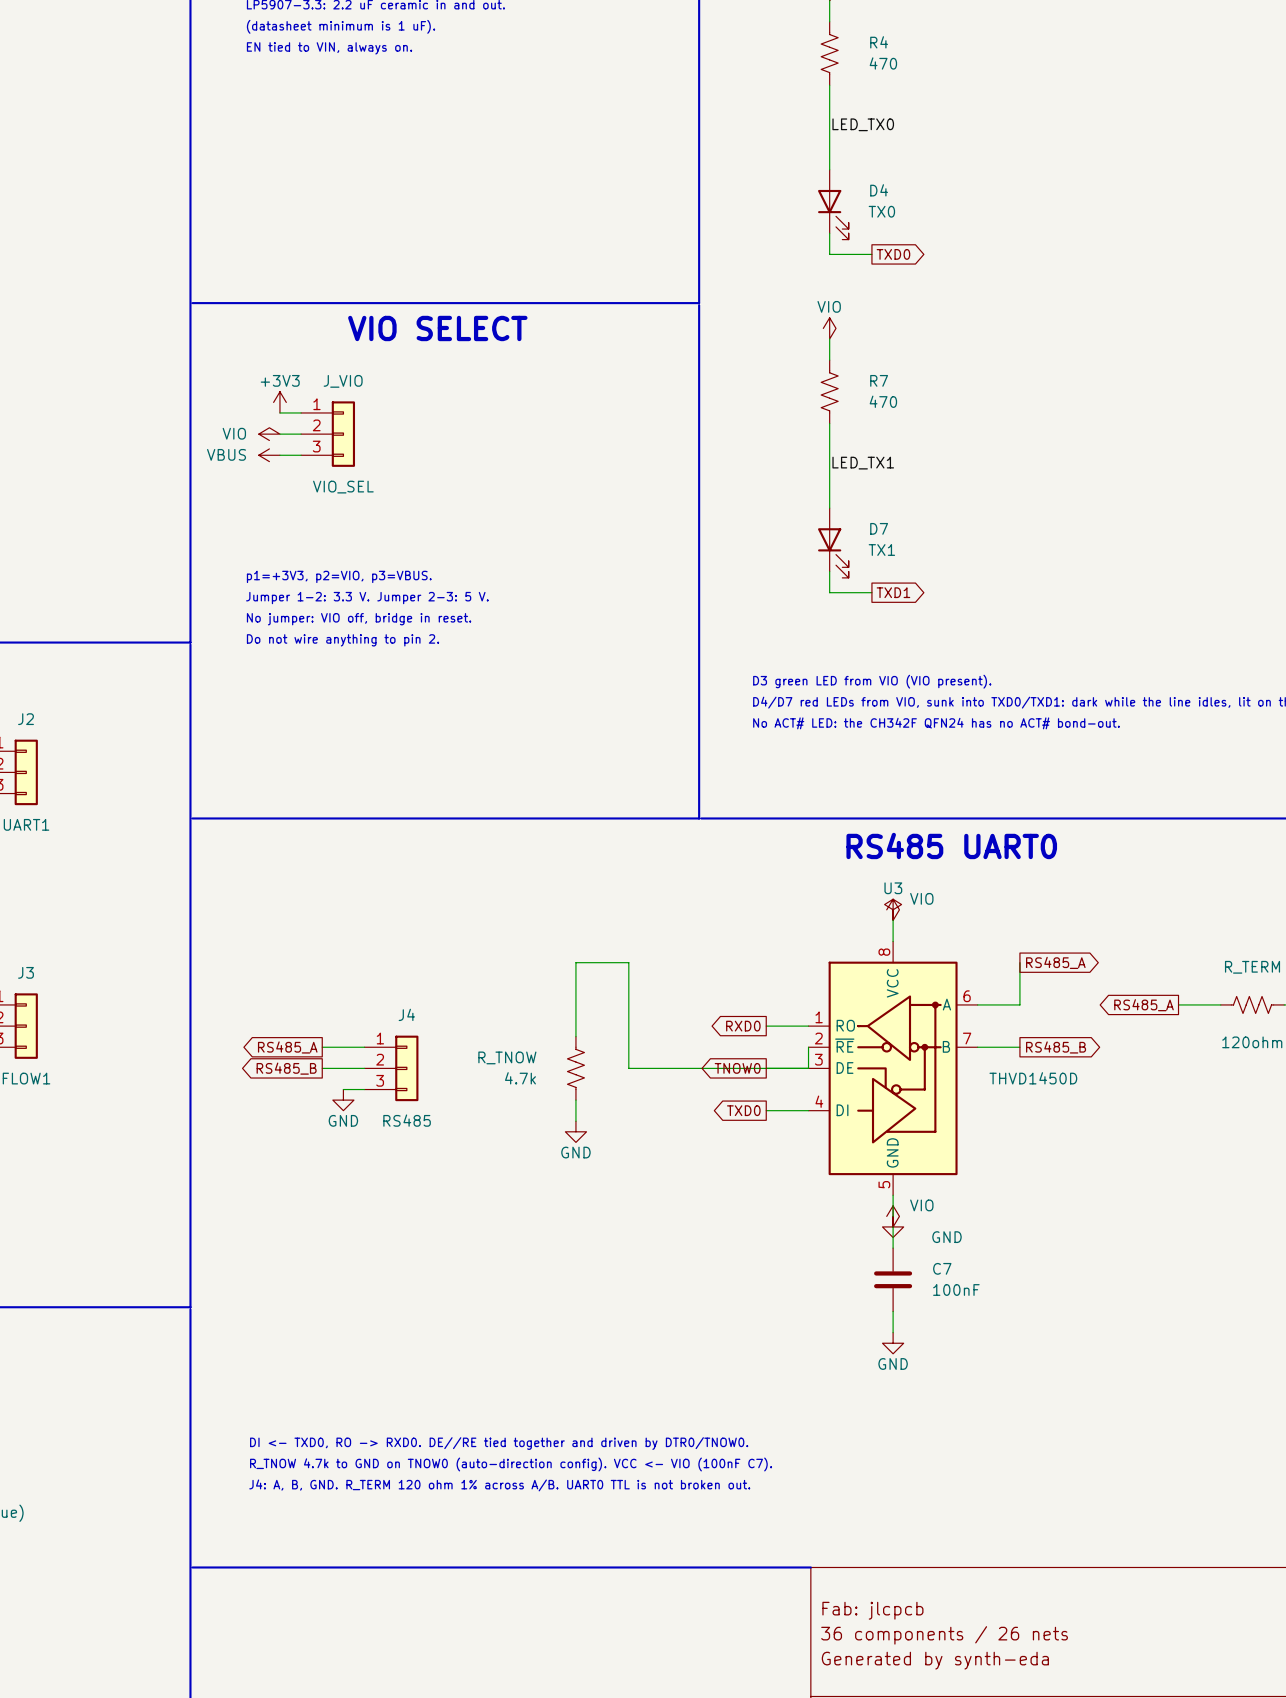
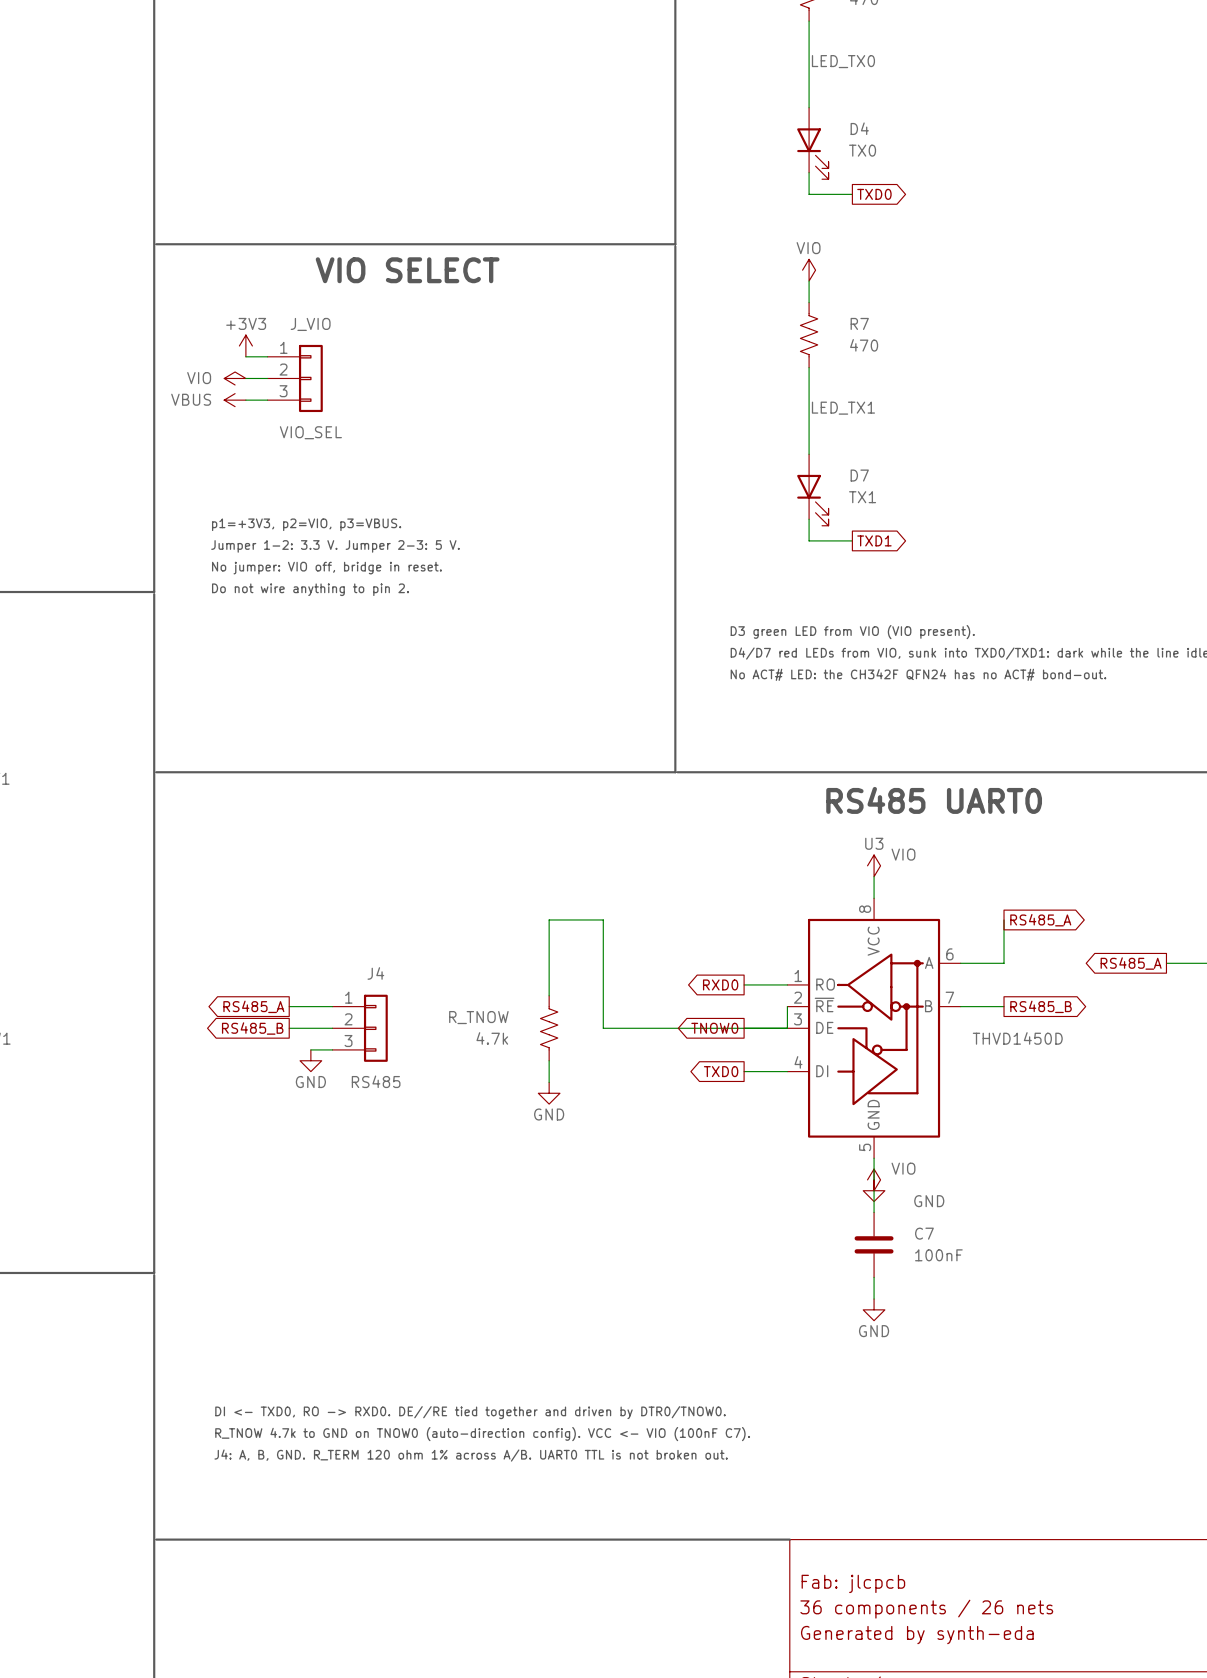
power symbol: (893, 909) -> none

